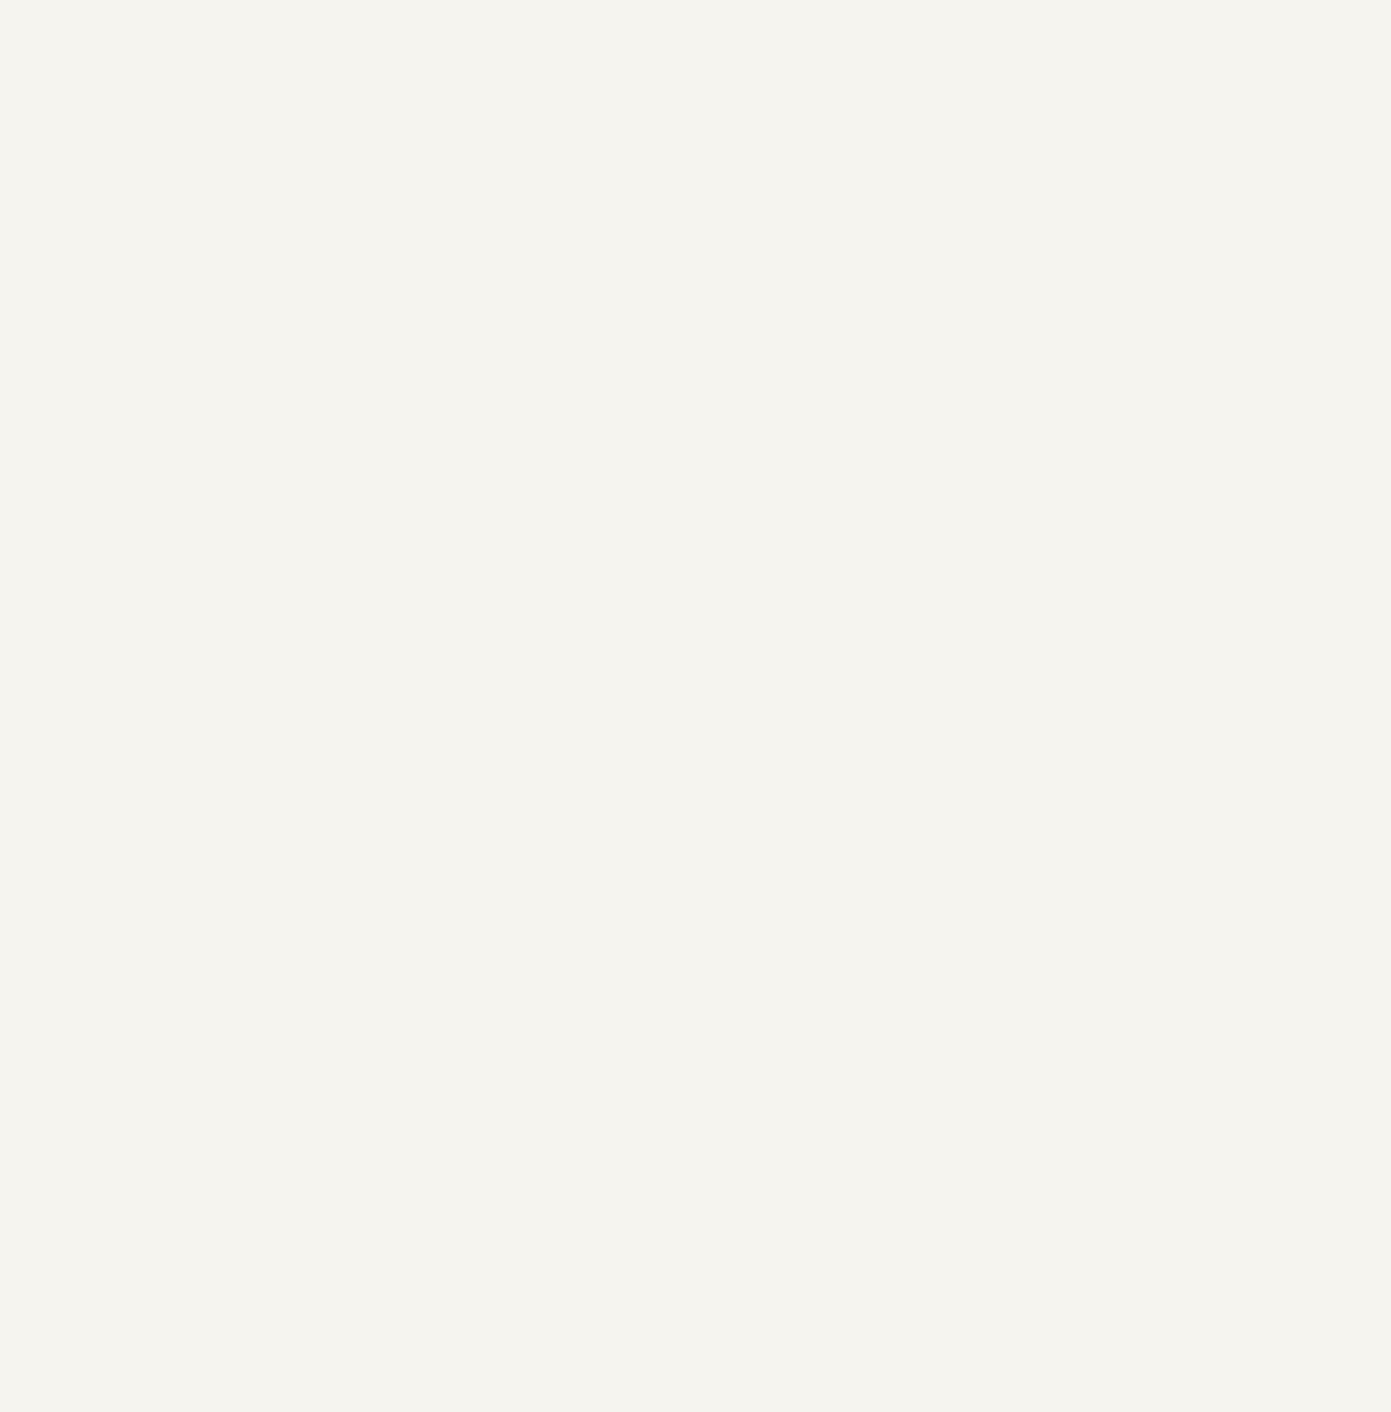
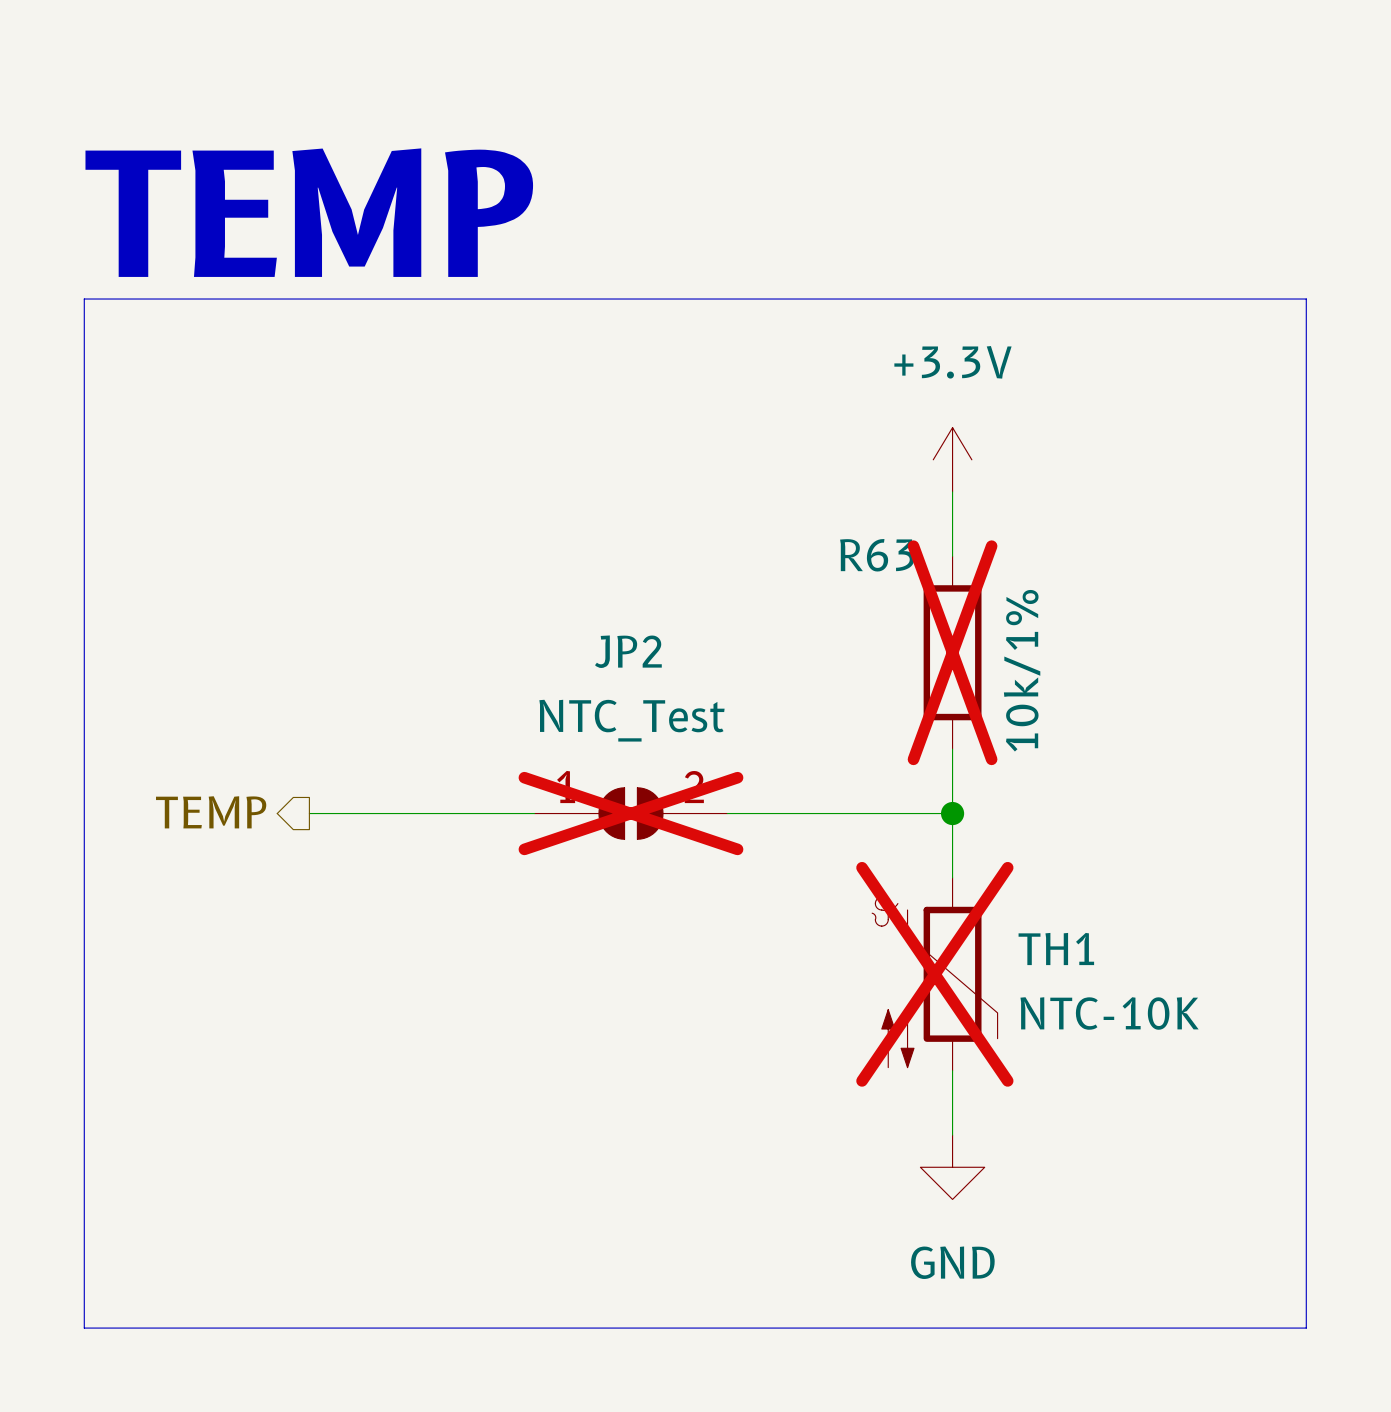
text: none -> TEMP (309, 212)
line: none -> (84, 299) (1306, 299) (1306, 1328) (84, 1328) (84, 299)
power symbol: none -> +3.3V (952, 459)
wire: none -> (952, 491) (952, 556)
R63: none -> 10k/1% (952, 652)
wire: none -> (952, 749) (952, 877)
hierarchical label: none -> TEMP (211, 812)
wire: none -> (309, 813) (534, 813)
JP2: none -> NTC_Test (630, 813)
wire: none -> (727, 813) (952, 813)
junction: none -> (952, 813)
TH1: none -> NTC-10K (934, 974)
wire: none -> (952, 1070) (952, 1135)
power symbol: none -> GND (952, 1167)

